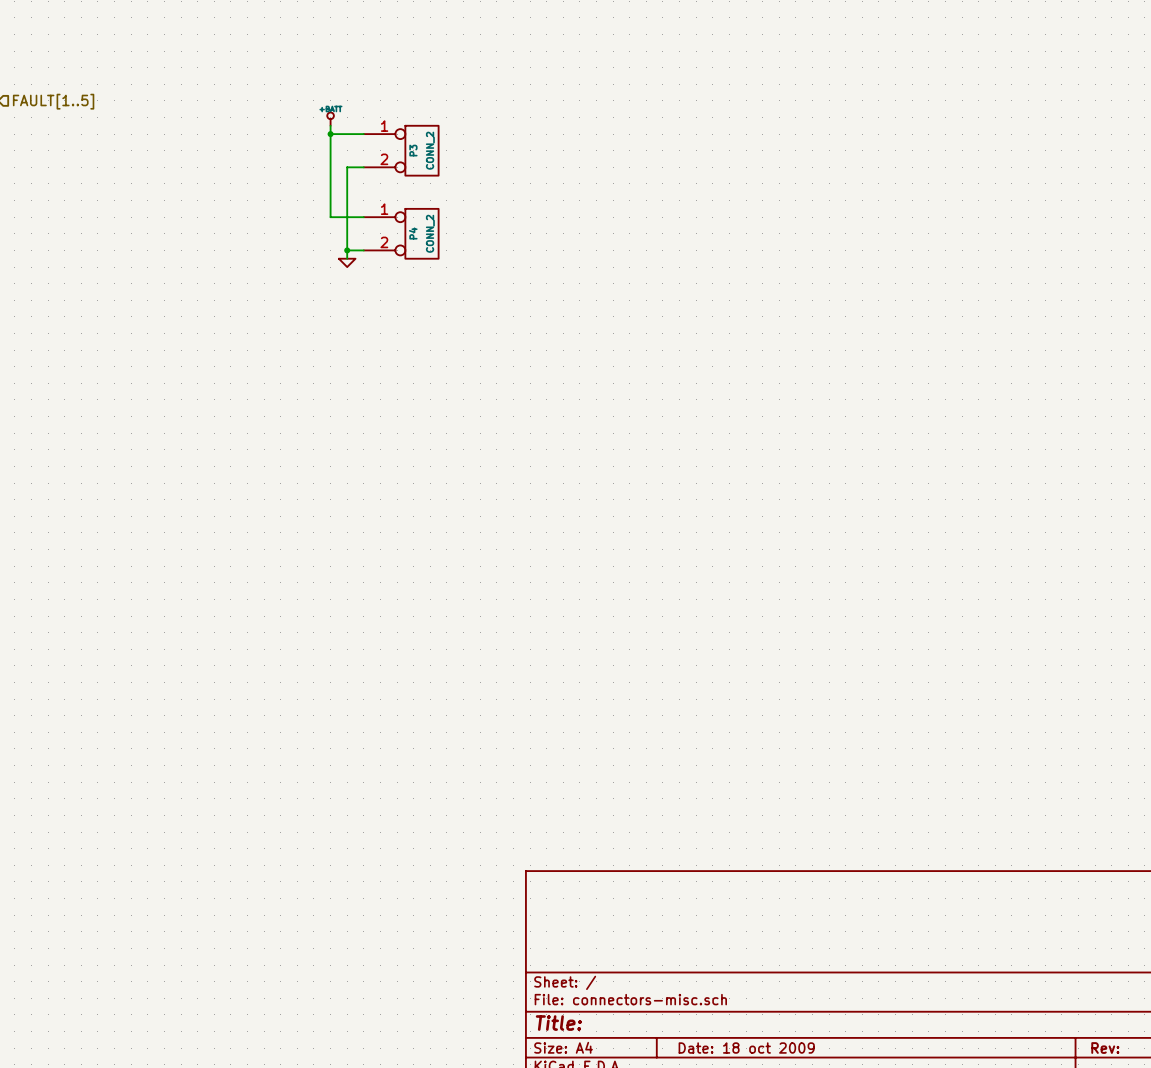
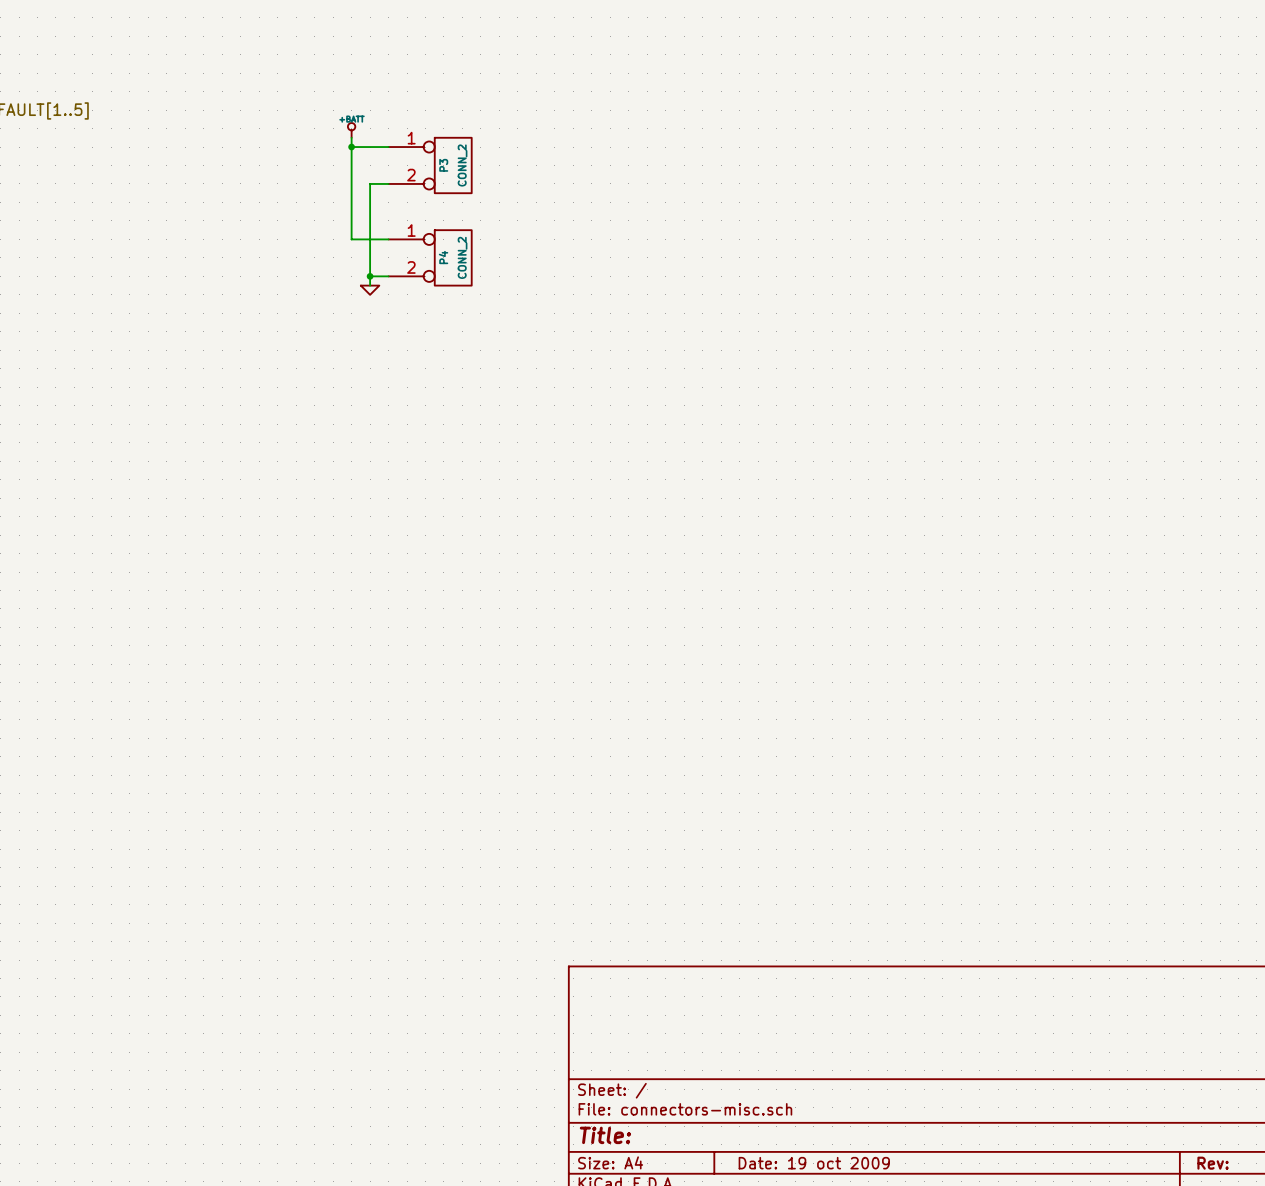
title block: Date: 18 oct 2009 (746, 1048) -> Date: 19 oct 2009 (814, 1163)

